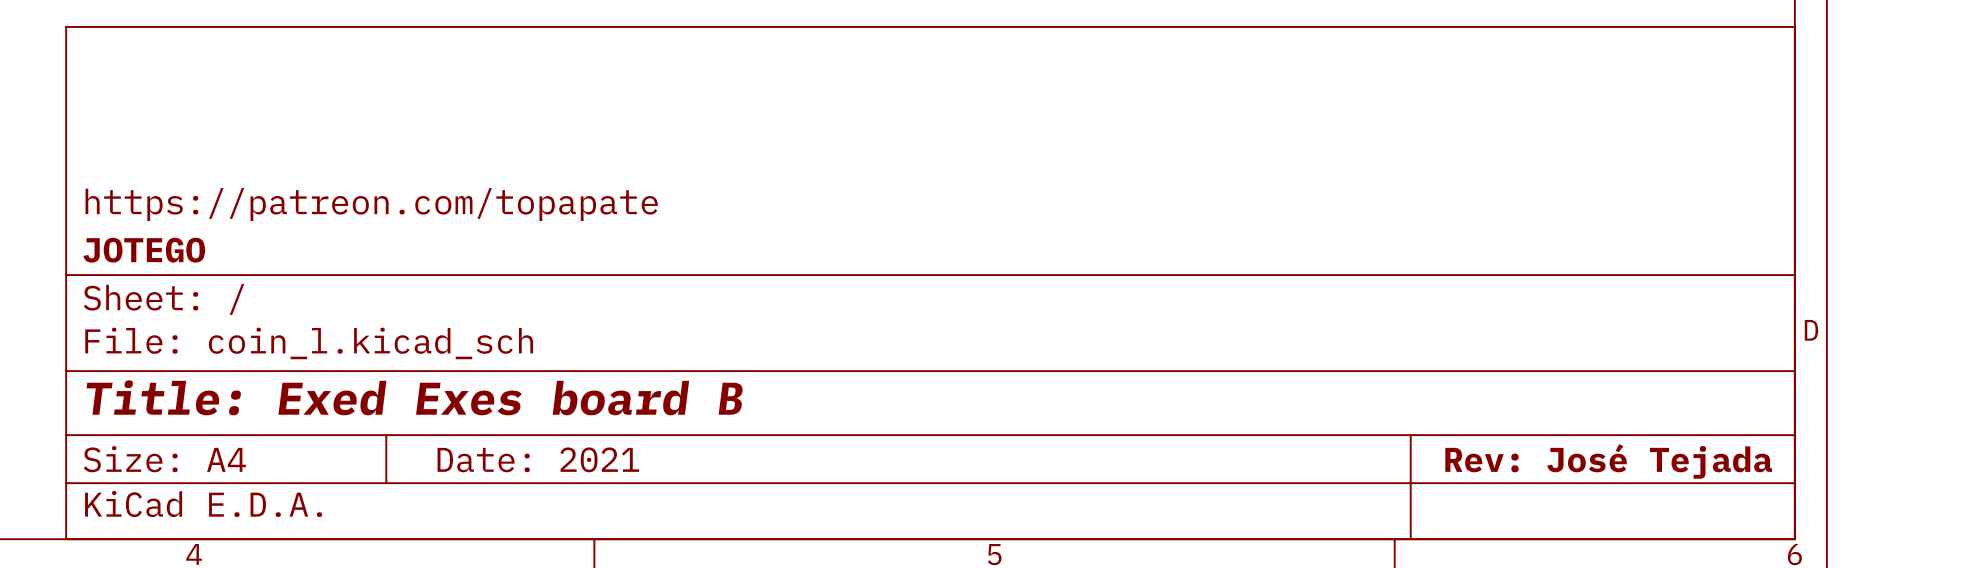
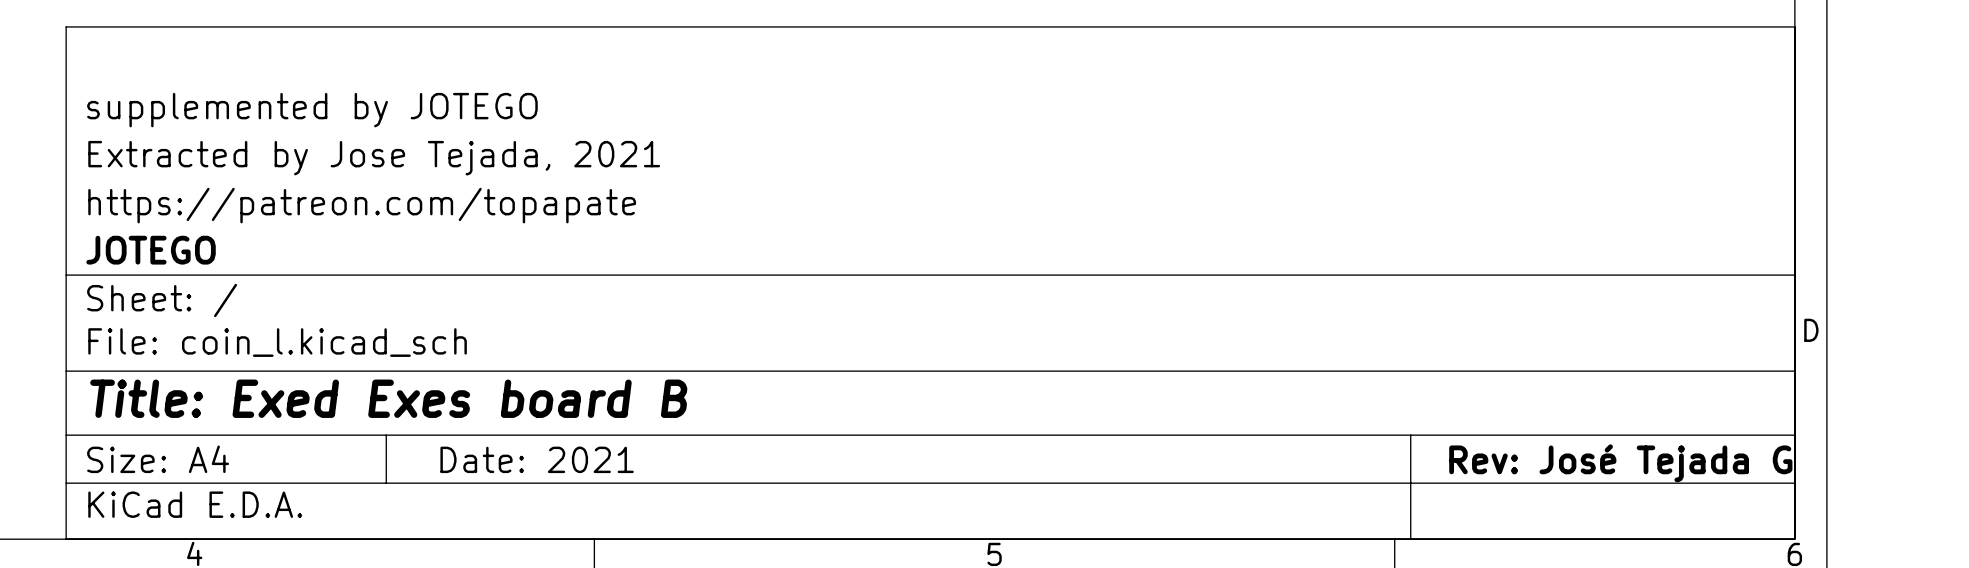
title block: none -> supplemented by JOTEGO (312, 110)
title block: none -> Extracted by Jose Tejada, 2021 (374, 158)
title block: Rev: José Tejada (1608, 461) -> Rev: José Tejada G (1620, 463)

